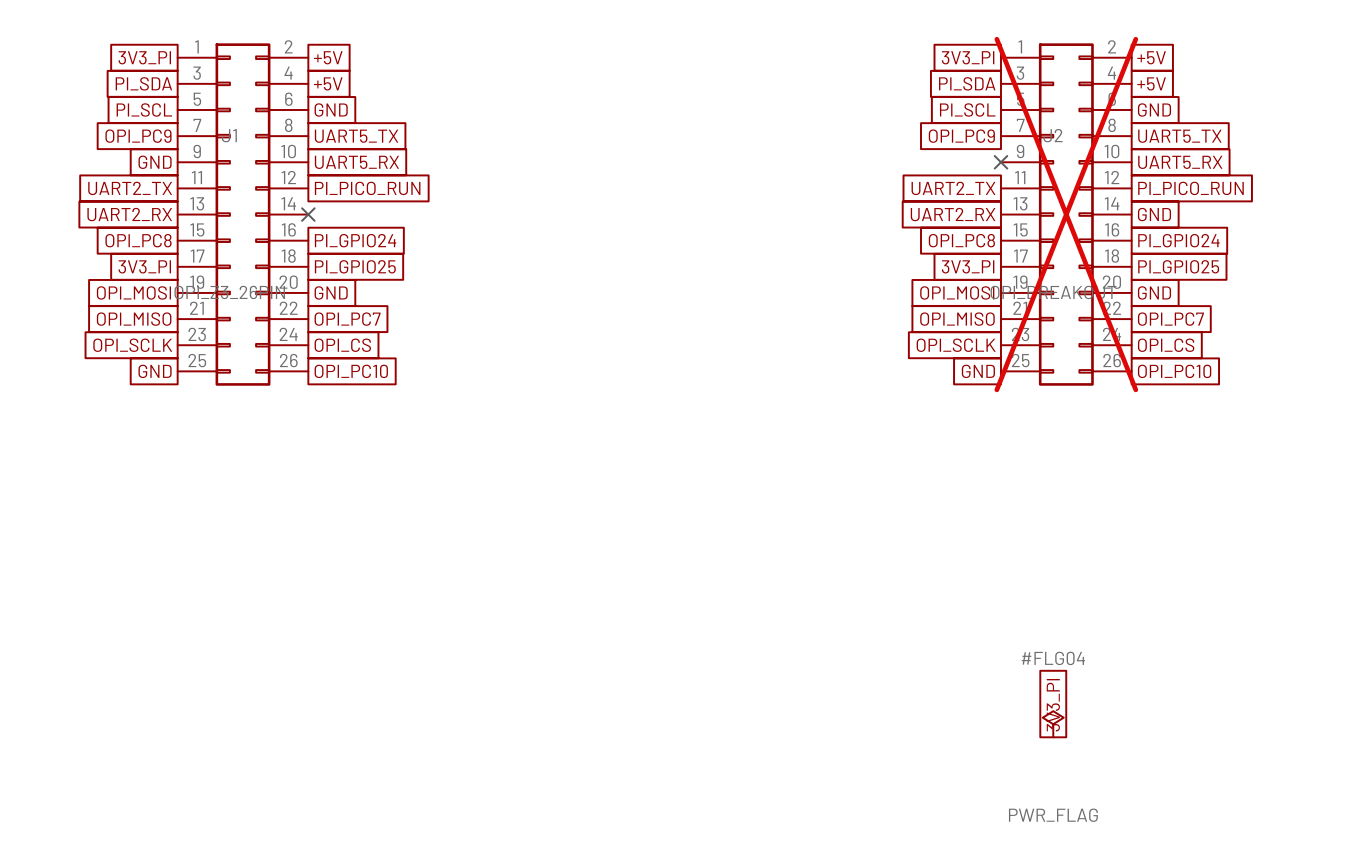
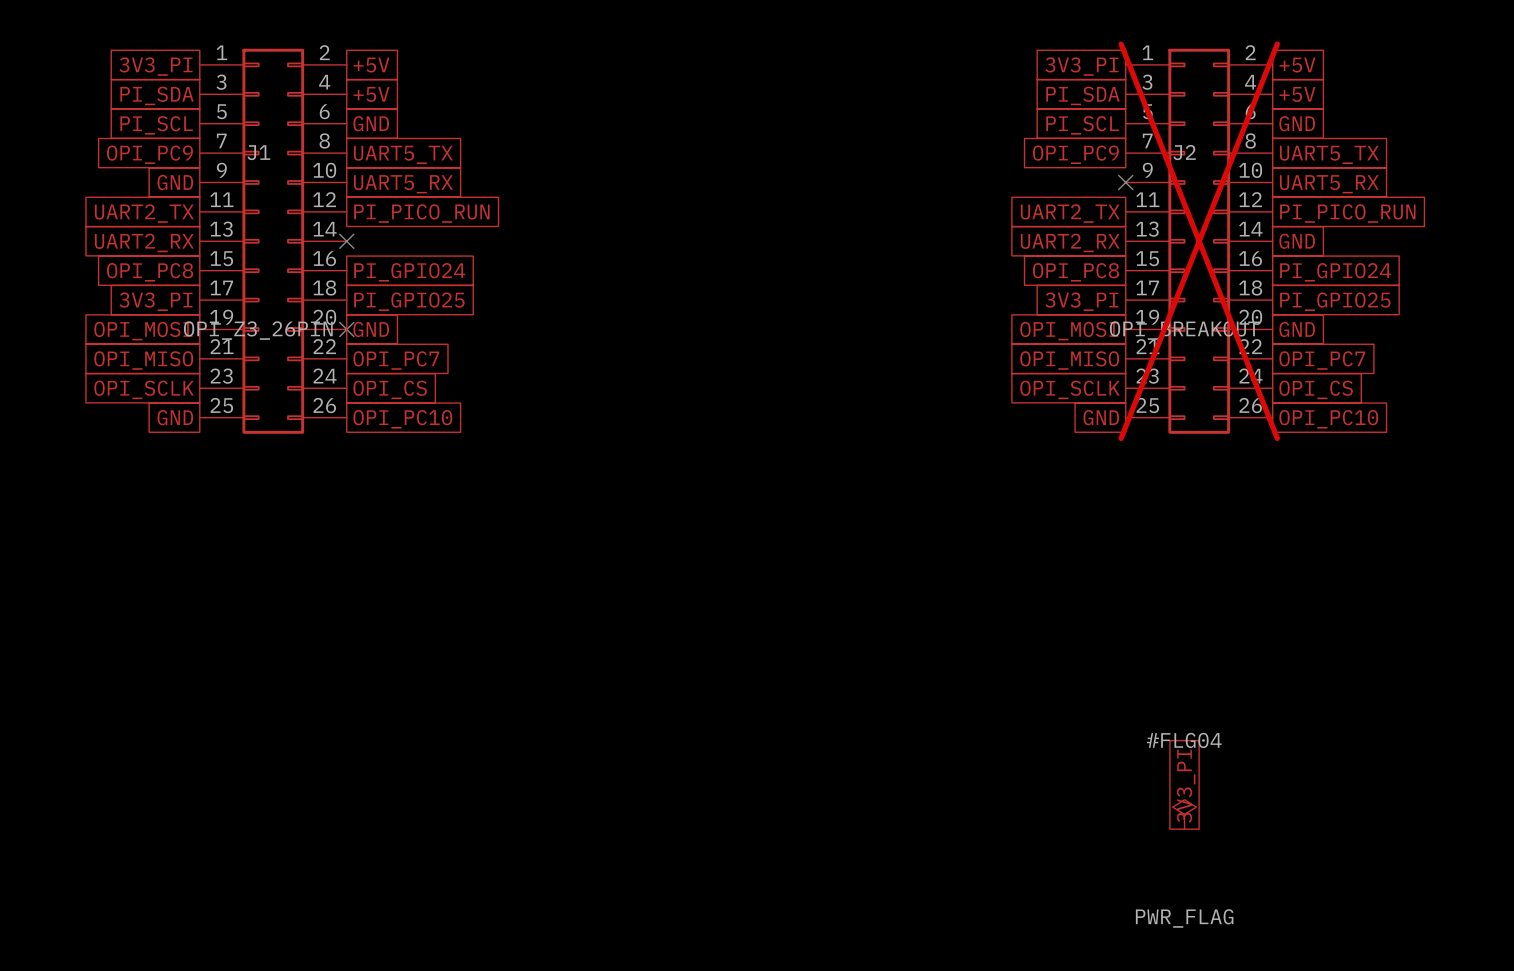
no-connect mark: none -> (346, 329)

